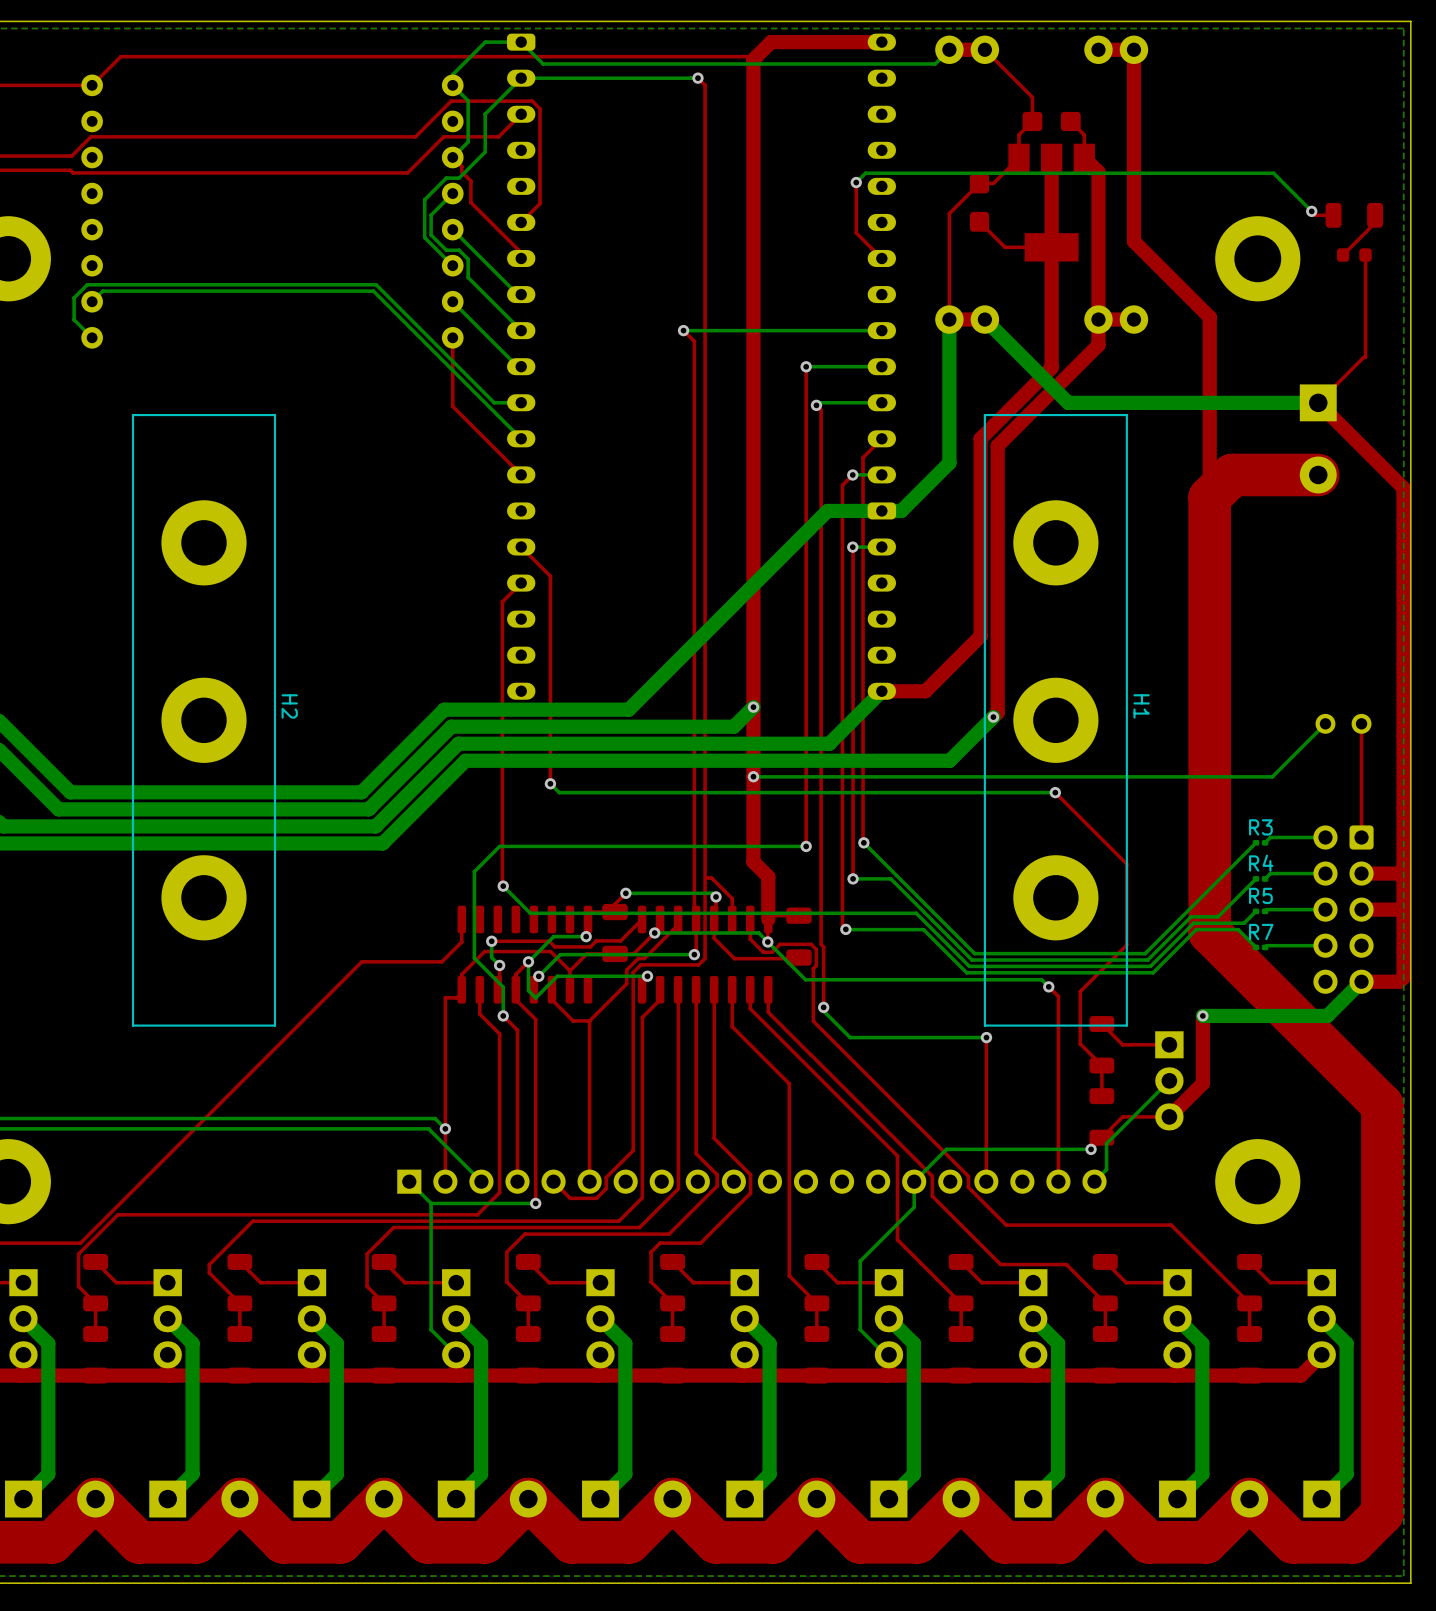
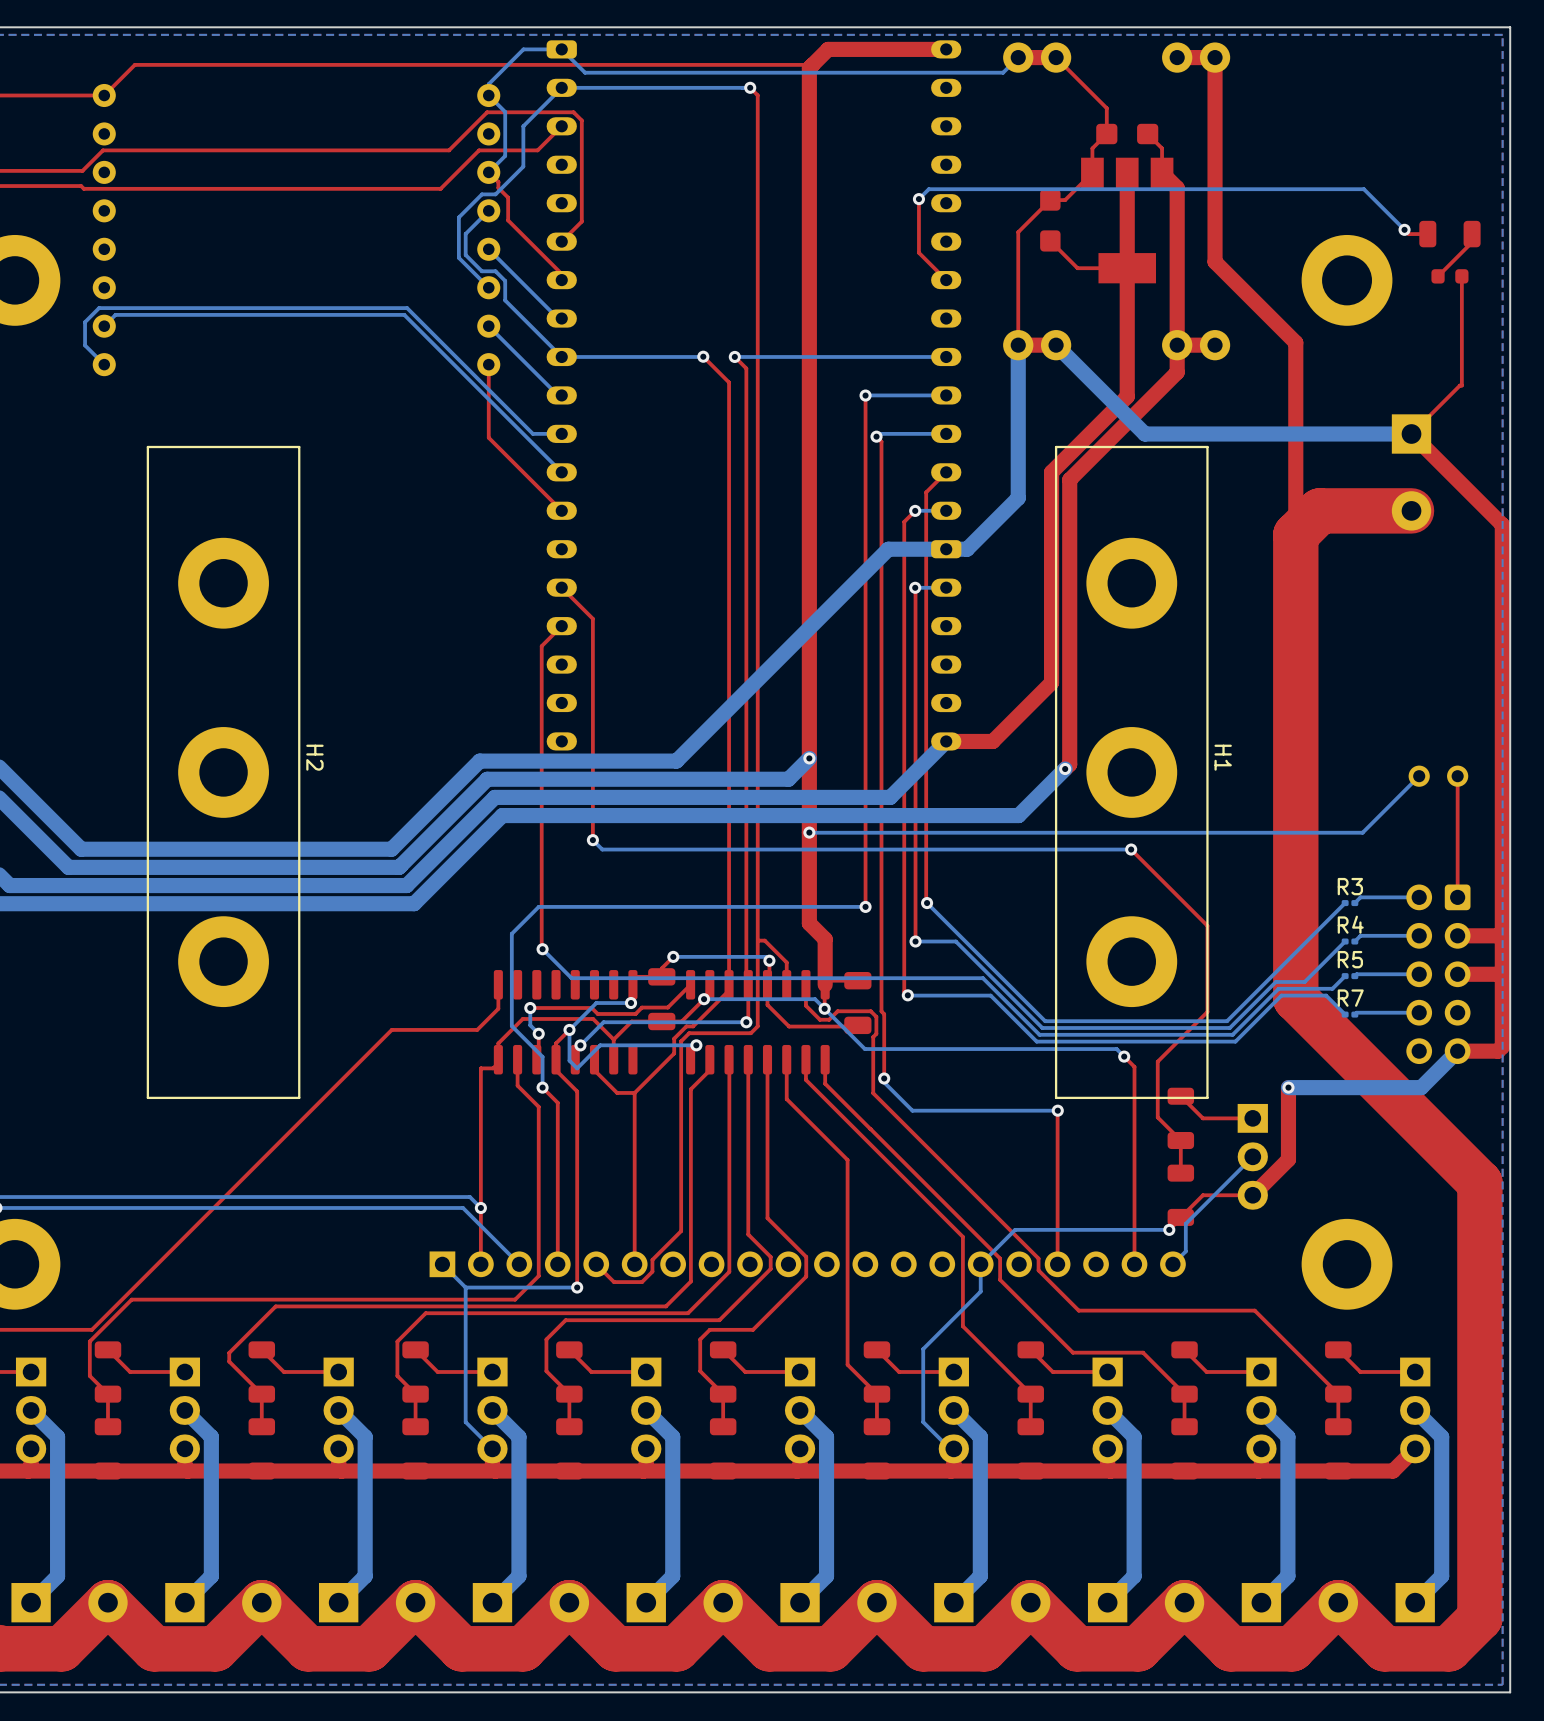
top track: none -> (703, 356) (729, 382) (729, 981)
bottom track: none -> (703, 356) (561, 356)
via: none -> (703, 356)

